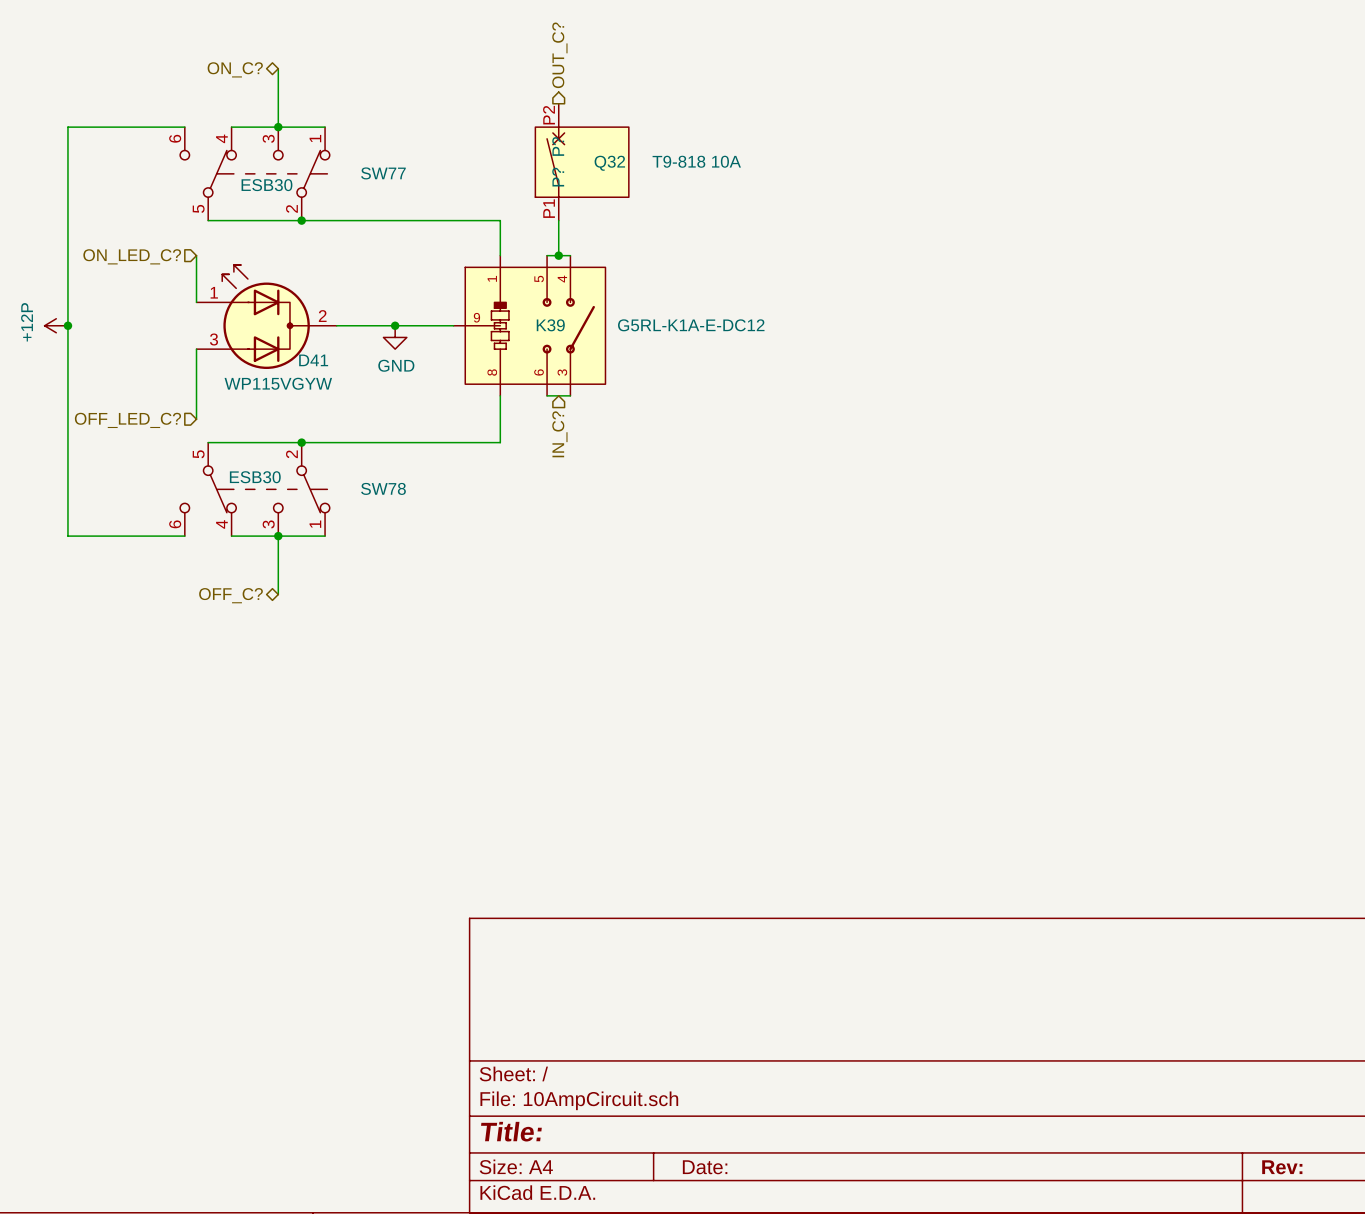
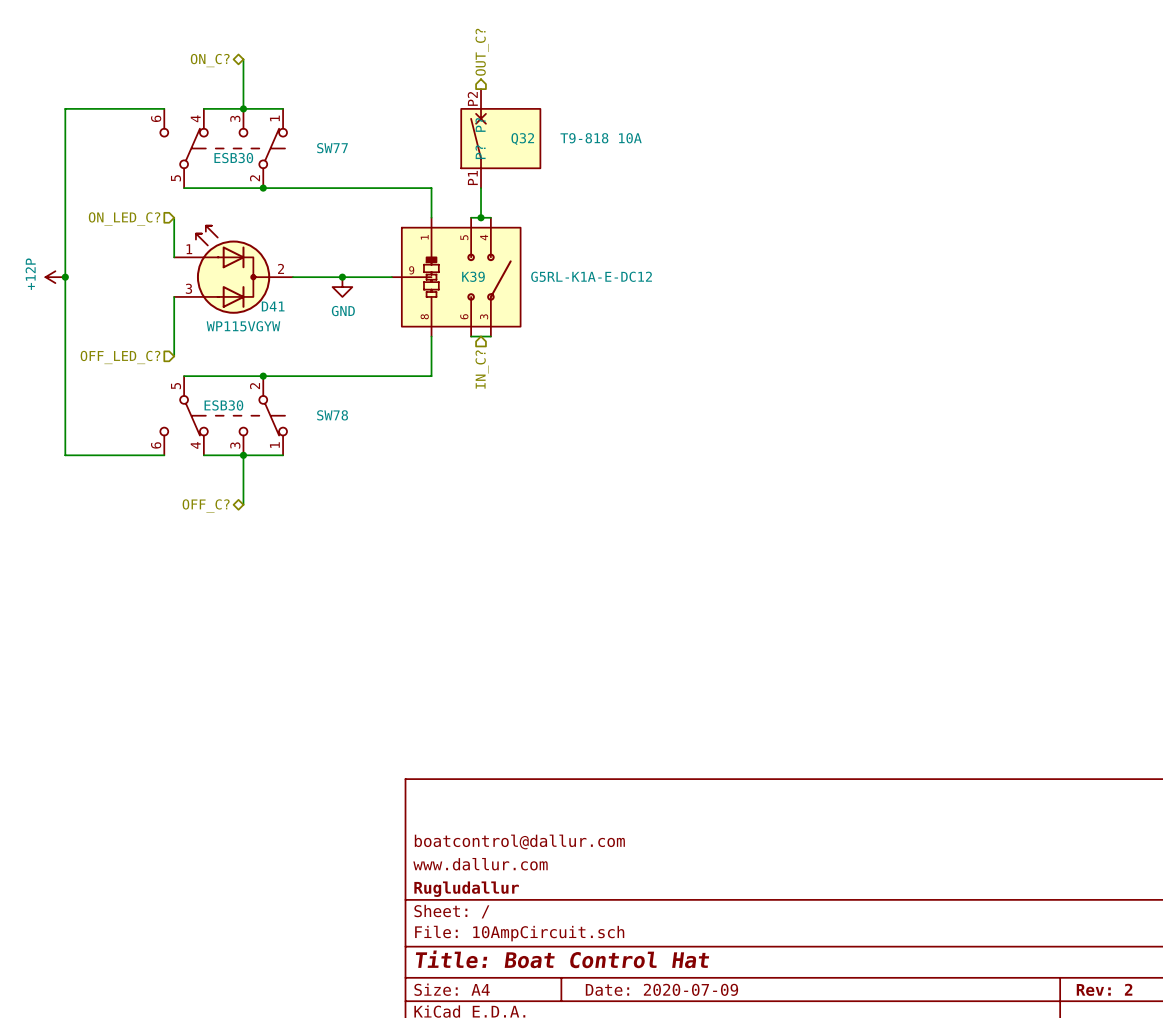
title block: none -> boatcontrol@dallur.com (519, 841)
title block: none -> www.dallur.com (480, 864)
title block: none -> Rugludallur (466, 889)
title block: Title: (511, 1131) -> Title: Boat Control Hat (562, 959)
title block: Date: (705, 1167) -> Date: 2020-07-09 (661, 989)
title block: Rev: (1282, 1167) -> Rev: 2 (1104, 989)

